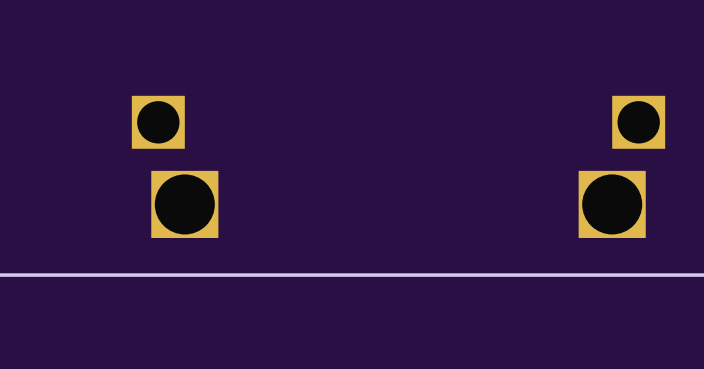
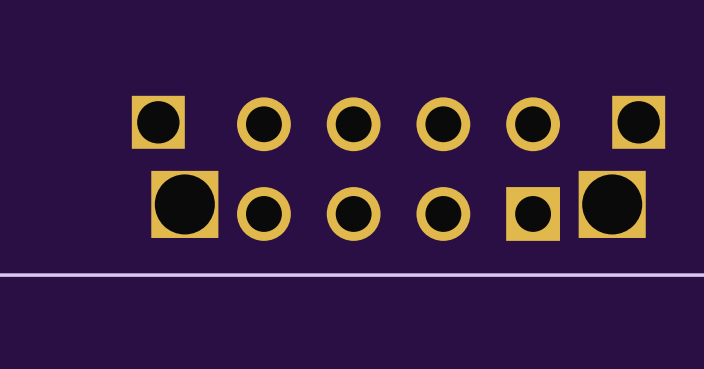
part: none -> (398, 169)

